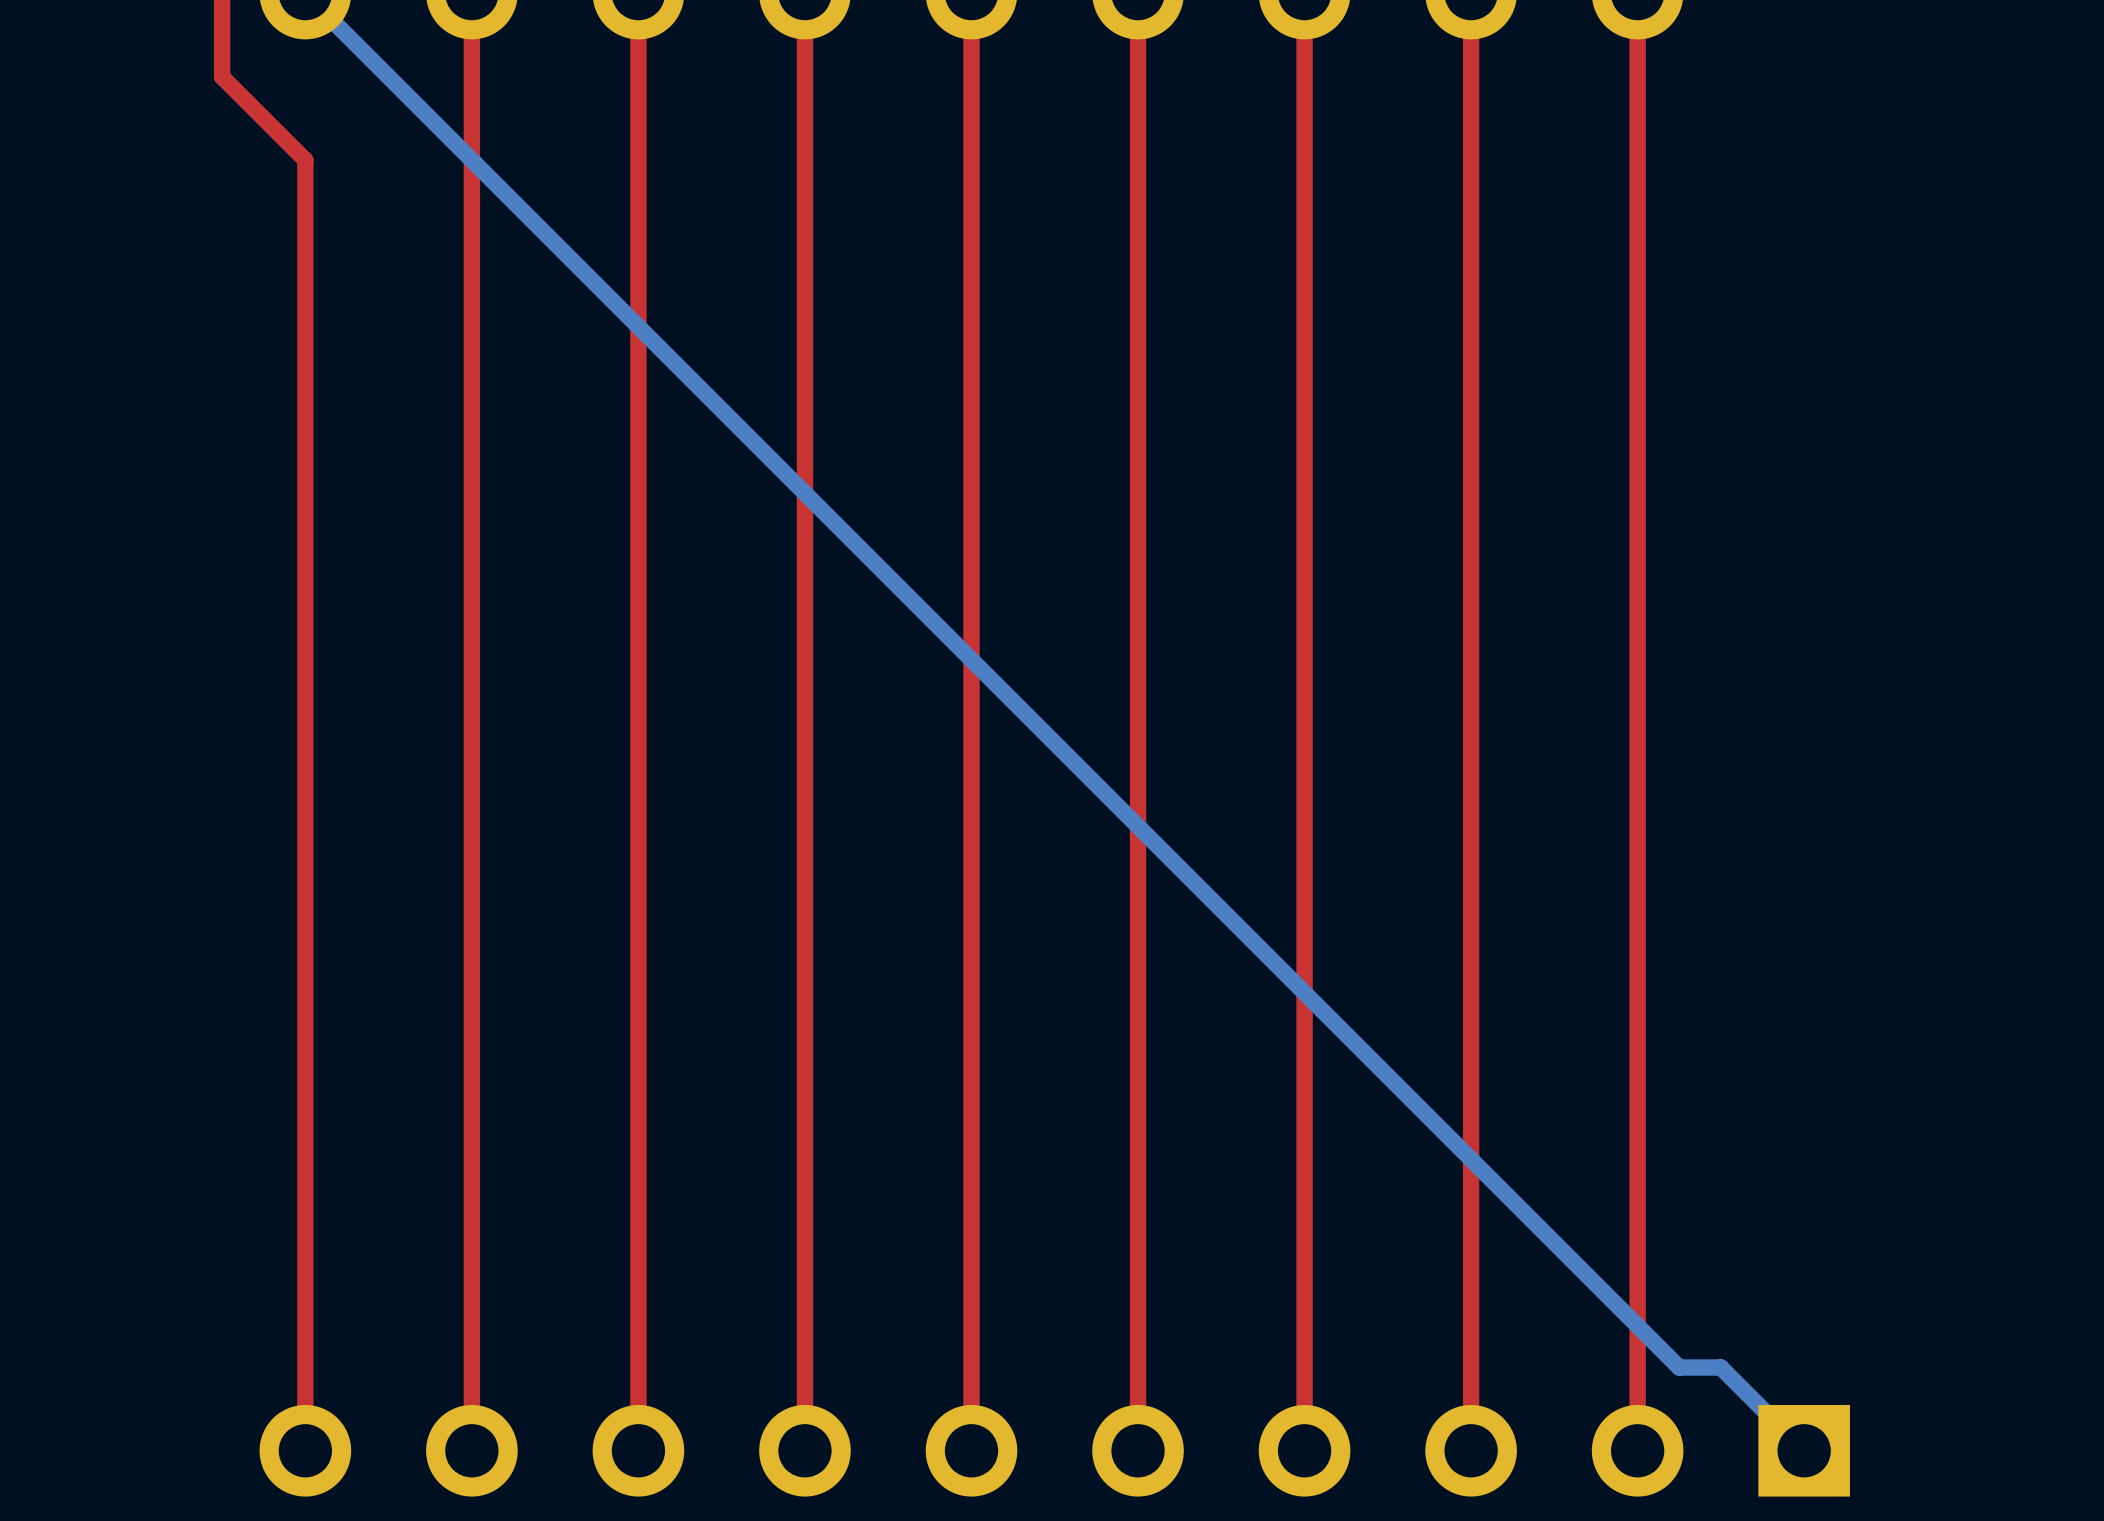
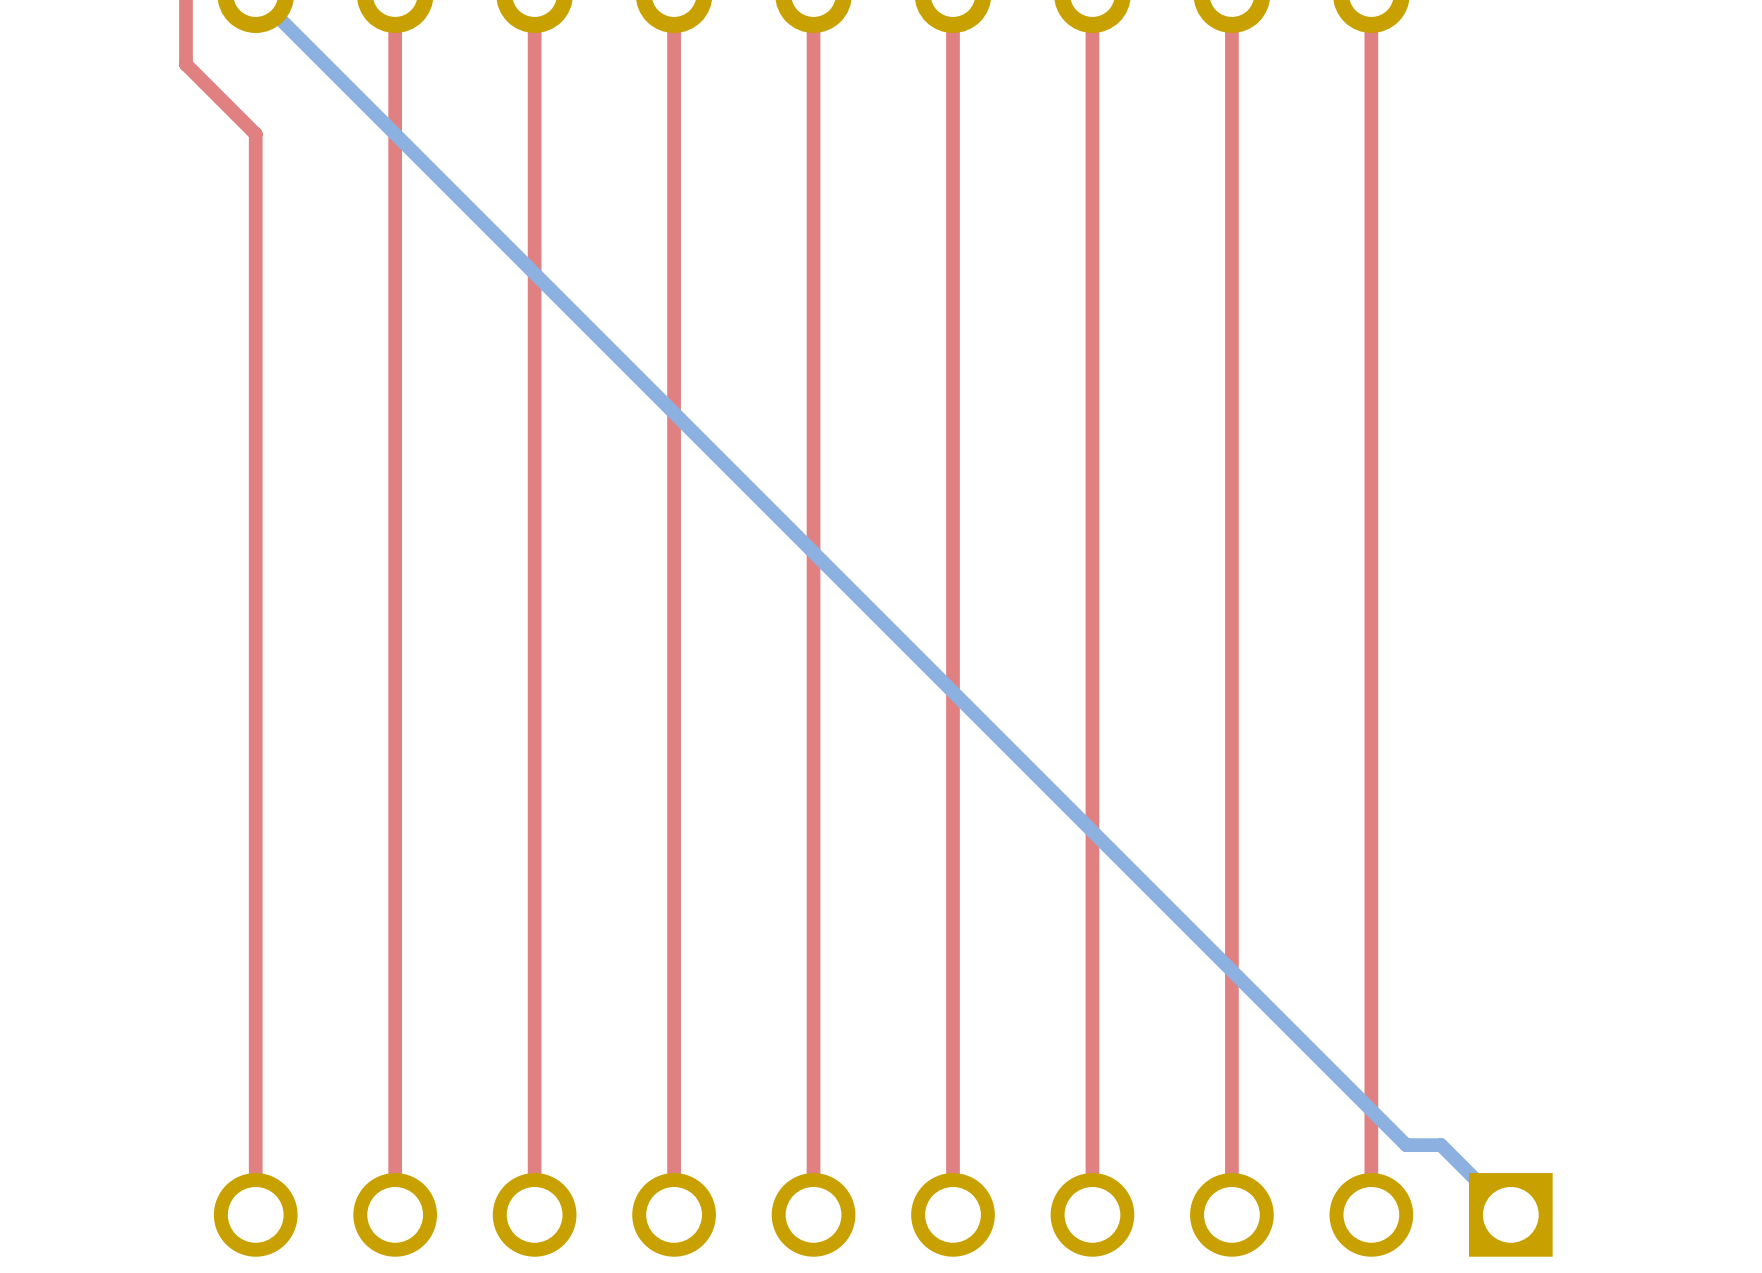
part footprint: [259, 1404, 1850, 1497] -> [213, 1173, 1553, 1257]

